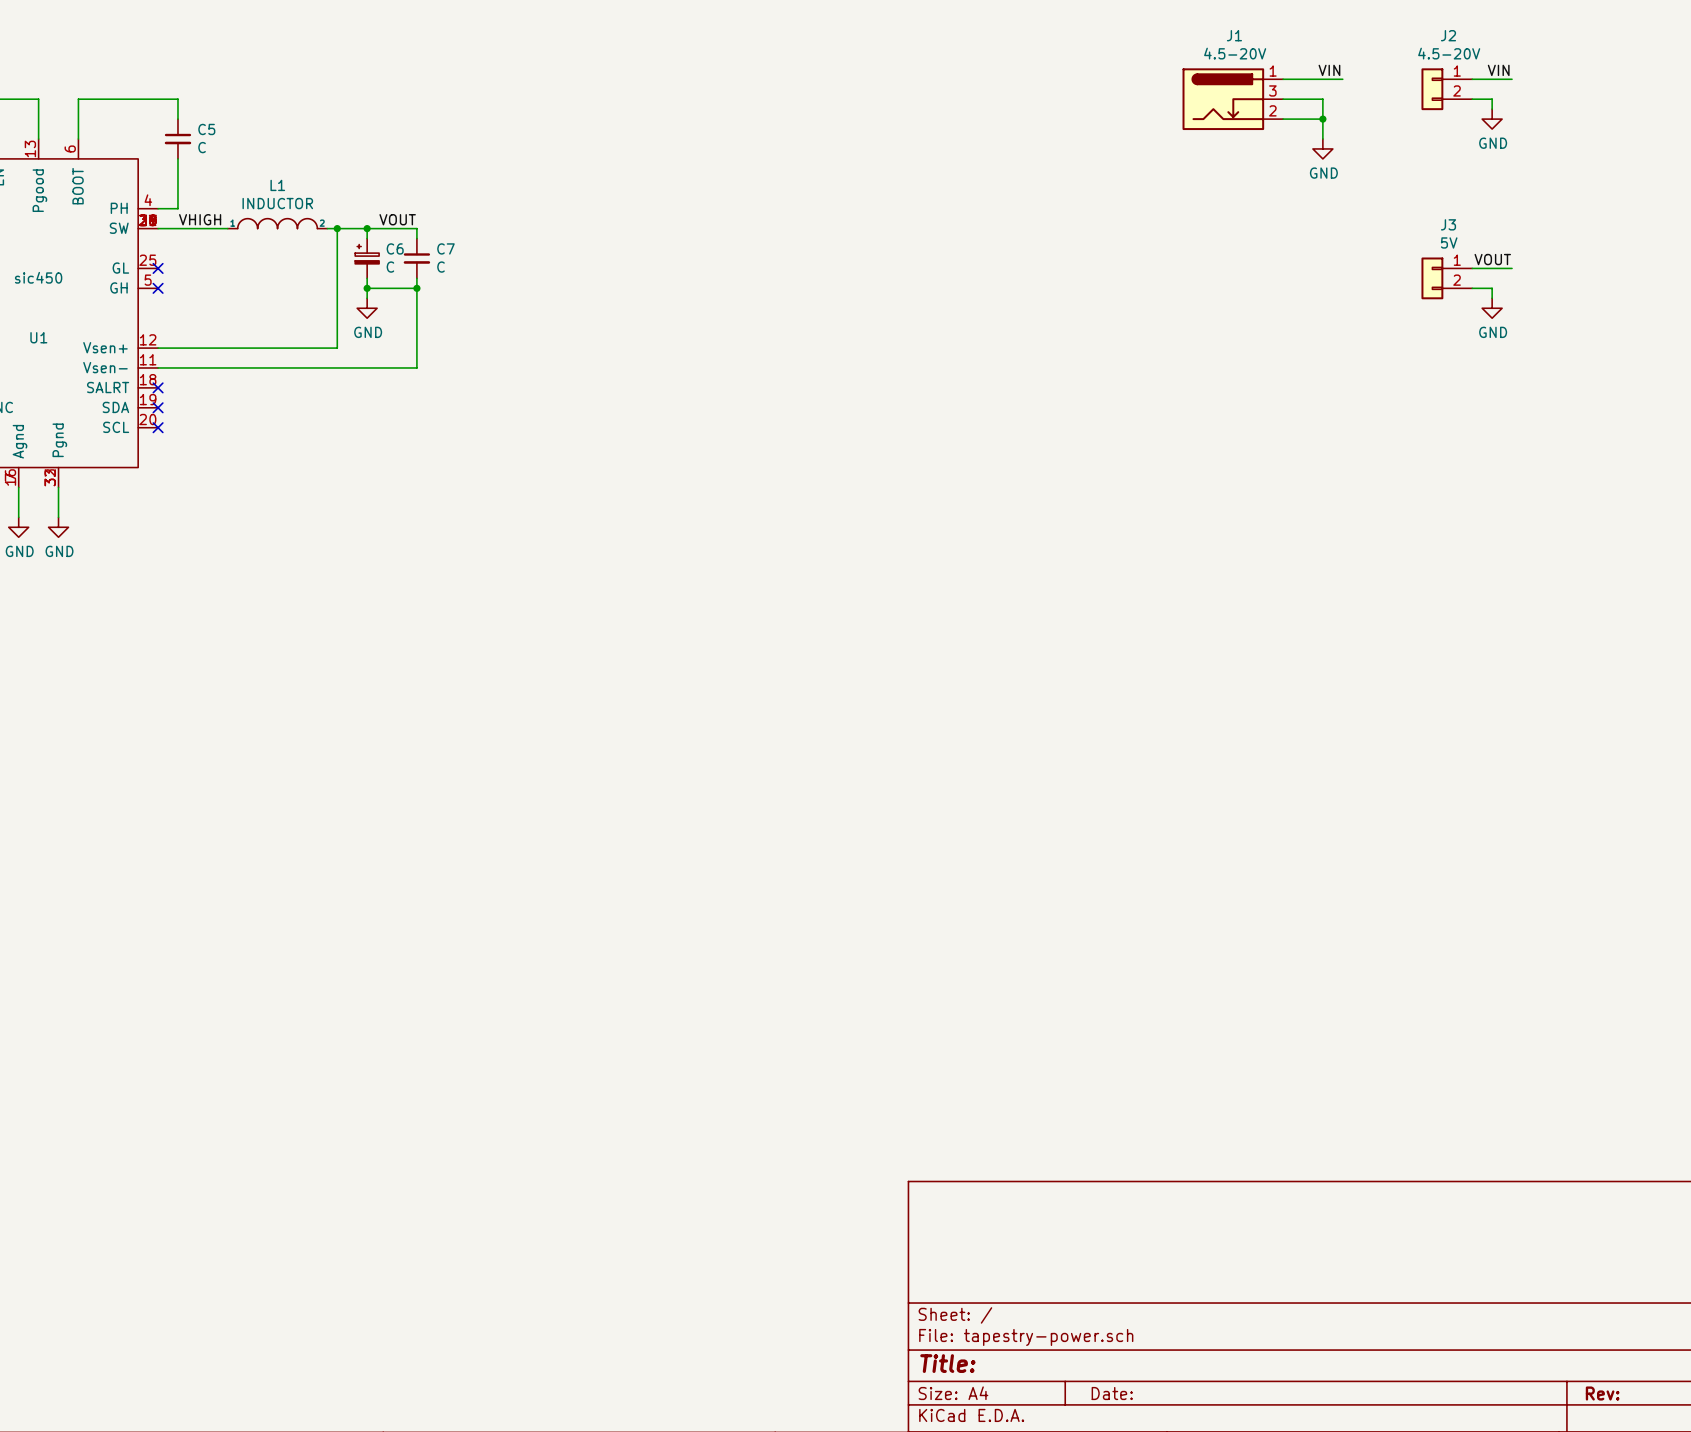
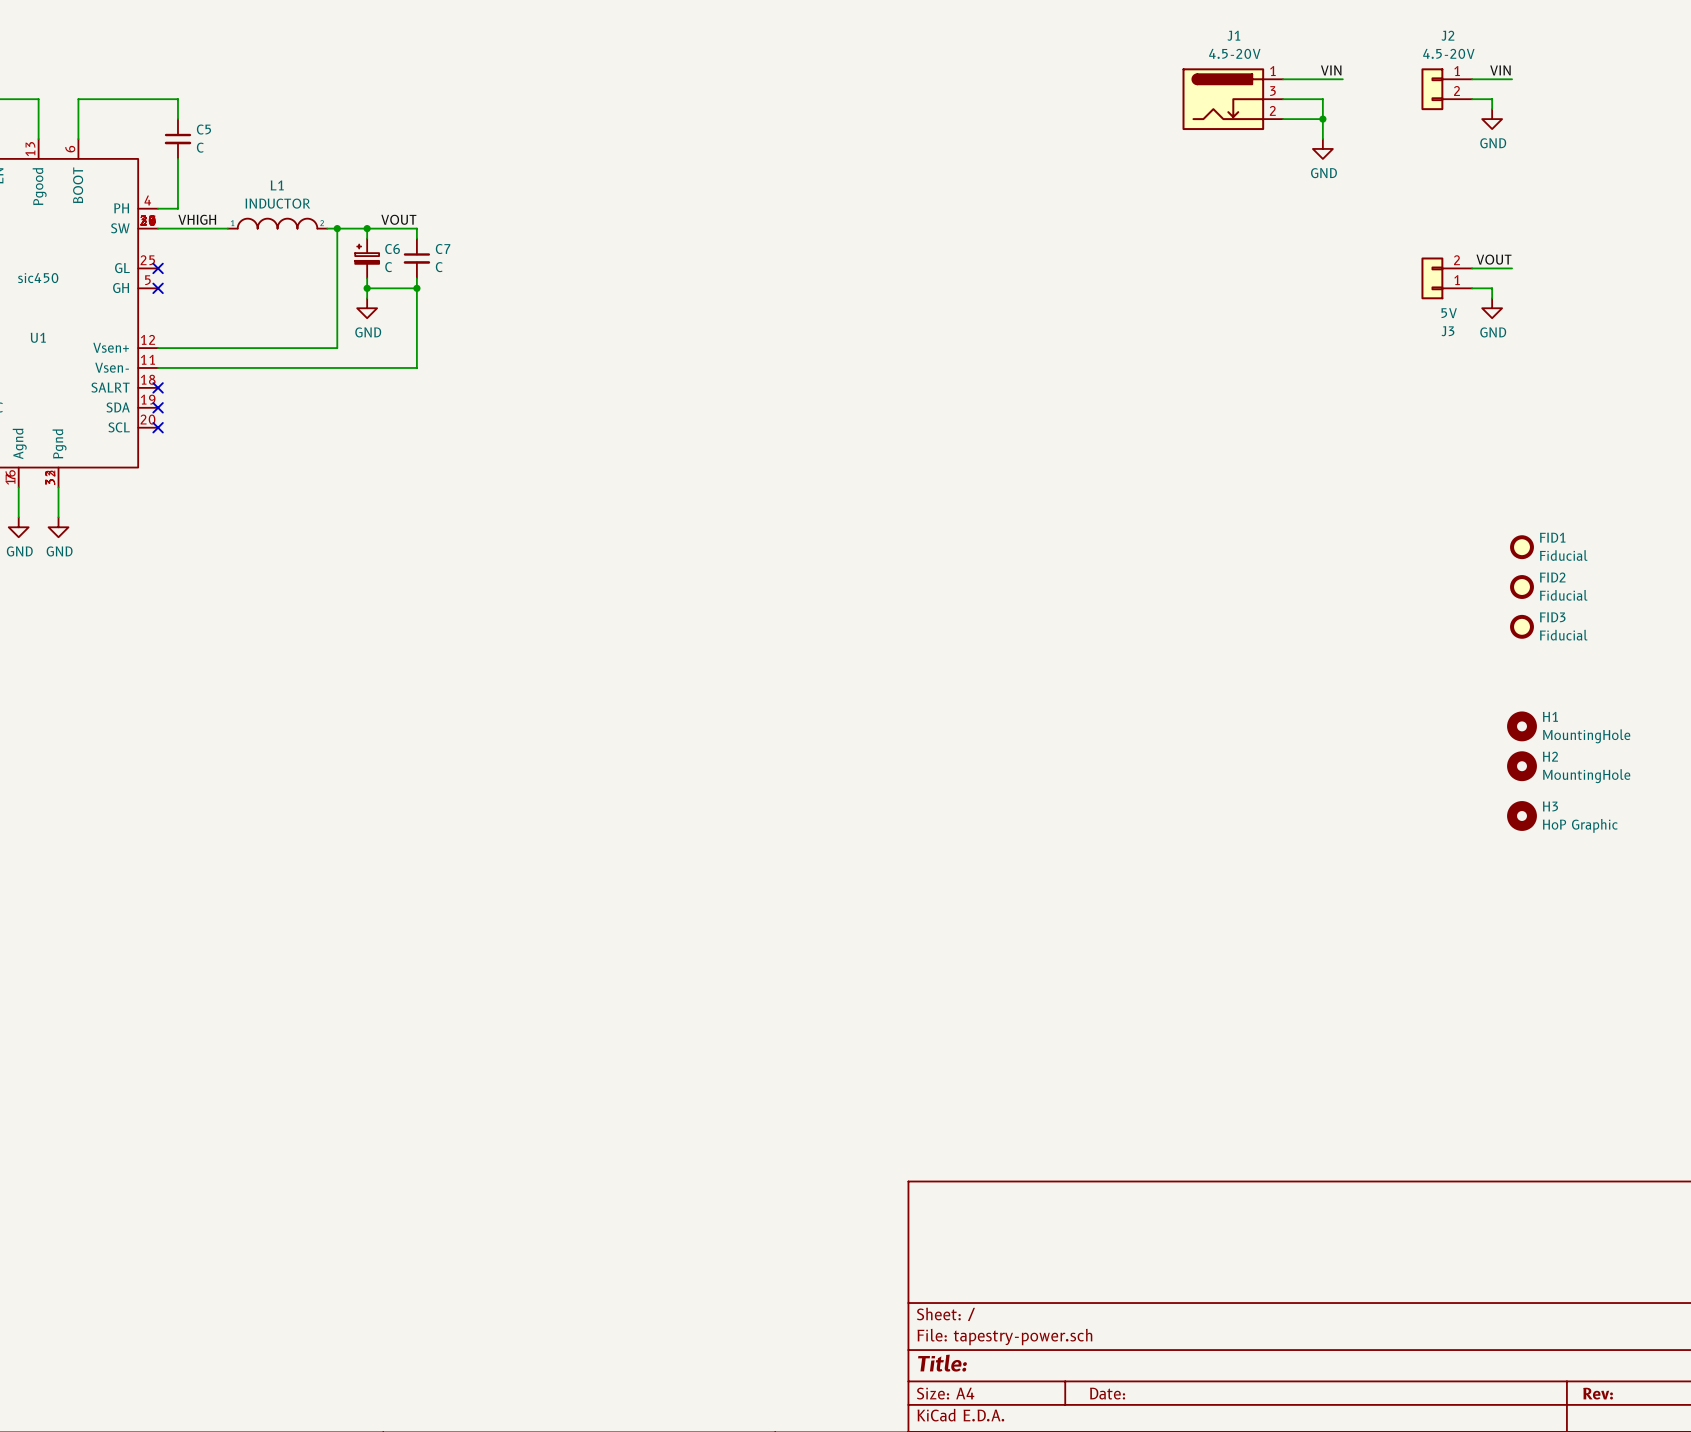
J3 flip: as is (1432, 278) -> up-down (1432, 278)
FID1: none -> Fiducial (1522, 547)
FID2: none -> Fiducial (1522, 587)
FID3: none -> Fiducial (1522, 626)
H1: none -> MountingHole (1522, 726)
H2: none -> MountingHole (1522, 766)
H3: none -> HoP Graphic (1522, 815)

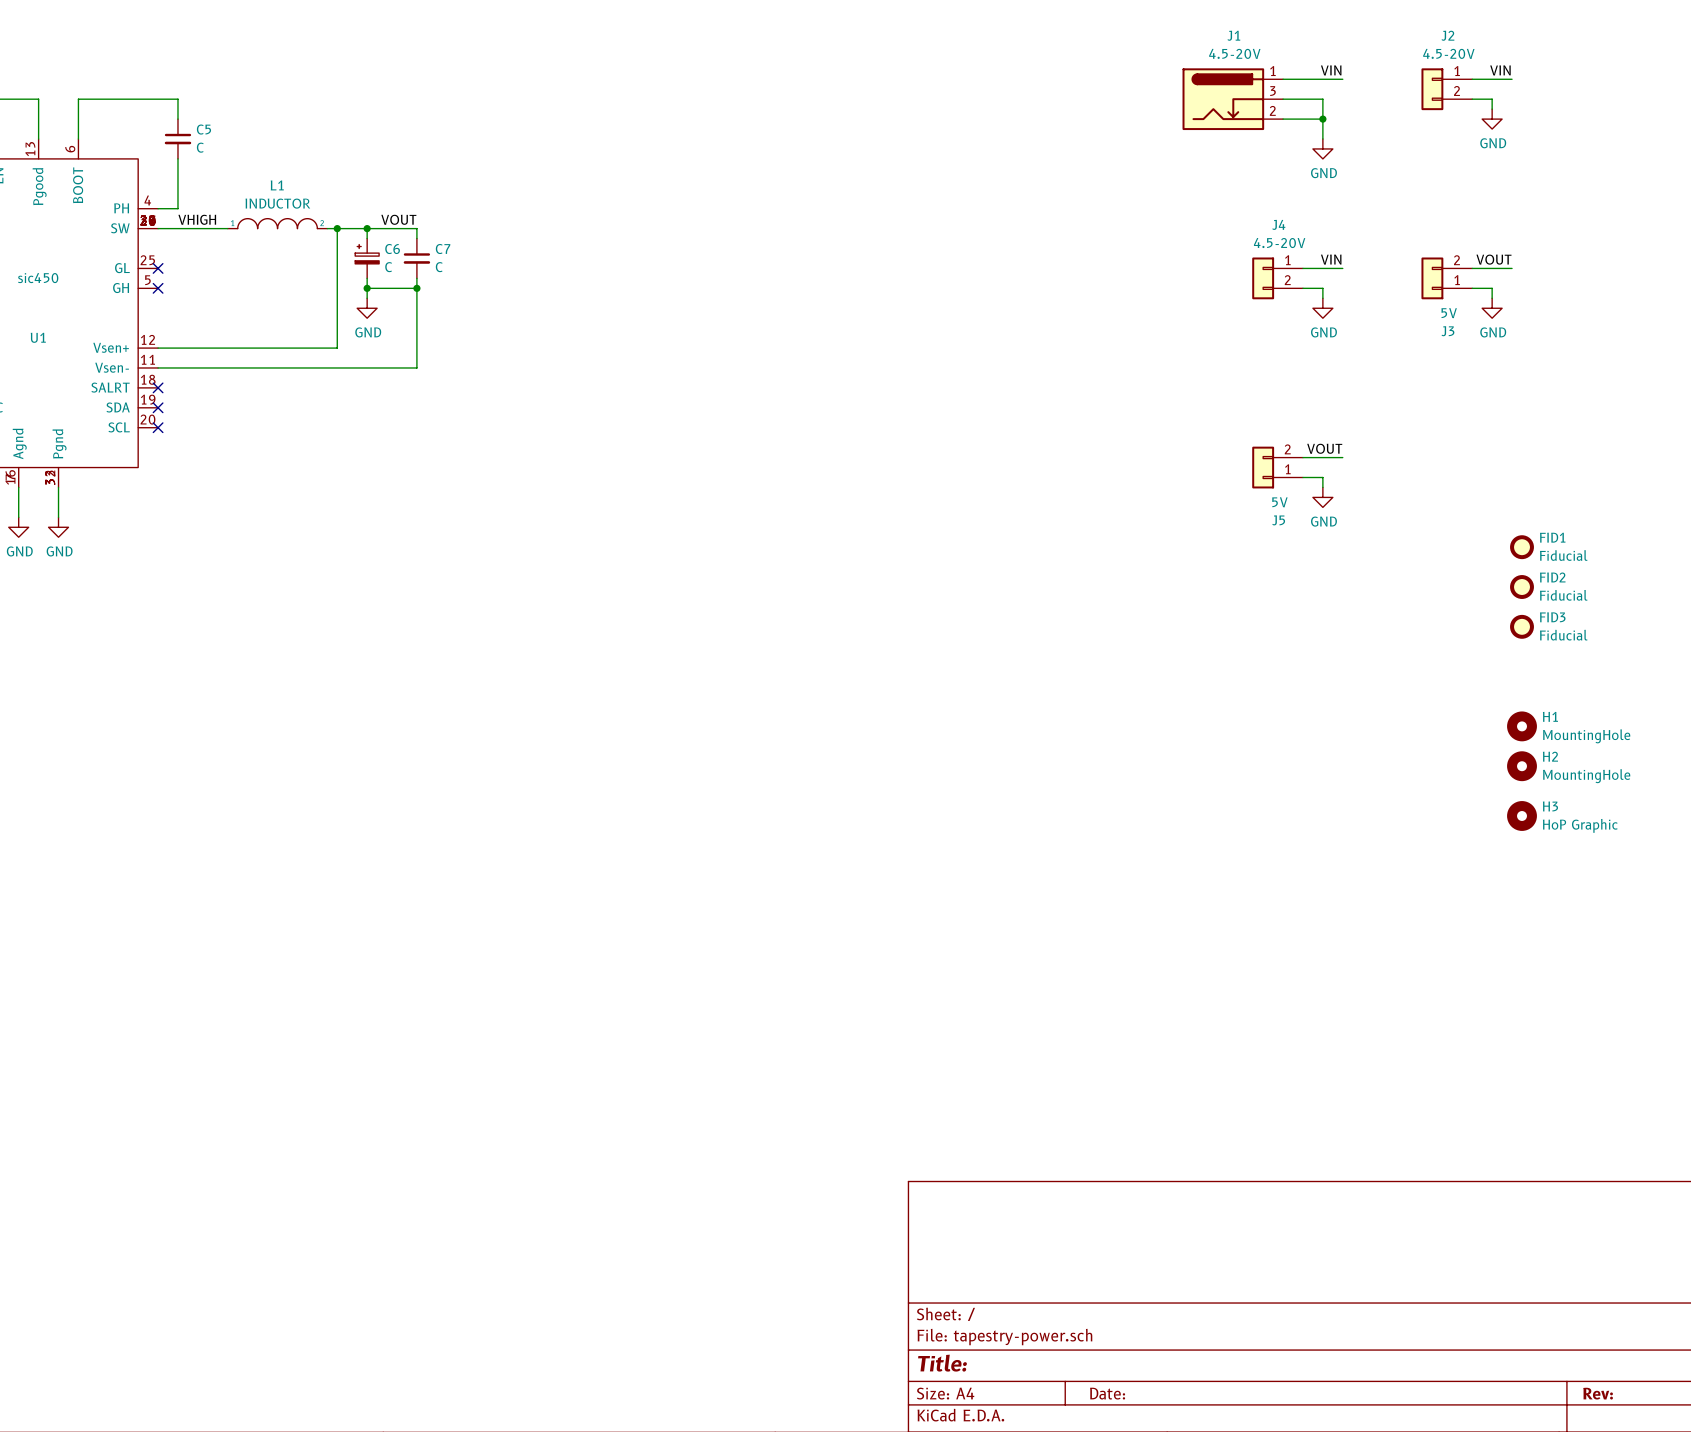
label: none -> VIN (1331, 259)
wire: none -> (1302, 268) (1342, 268)
J4: none -> 4.5-20V (1277, 278)
wire: none -> (1302, 288) (1322, 288) (1322, 298)
power symbol: none -> GND (1322, 308)
label: none -> VOUT (1324, 448)
wire: none -> (1302, 457) (1342, 457)
J5: none -> 5V (1277, 467)
wire: none -> (1302, 477) (1322, 477) (1322, 487)
power symbol: none -> GND (1322, 497)

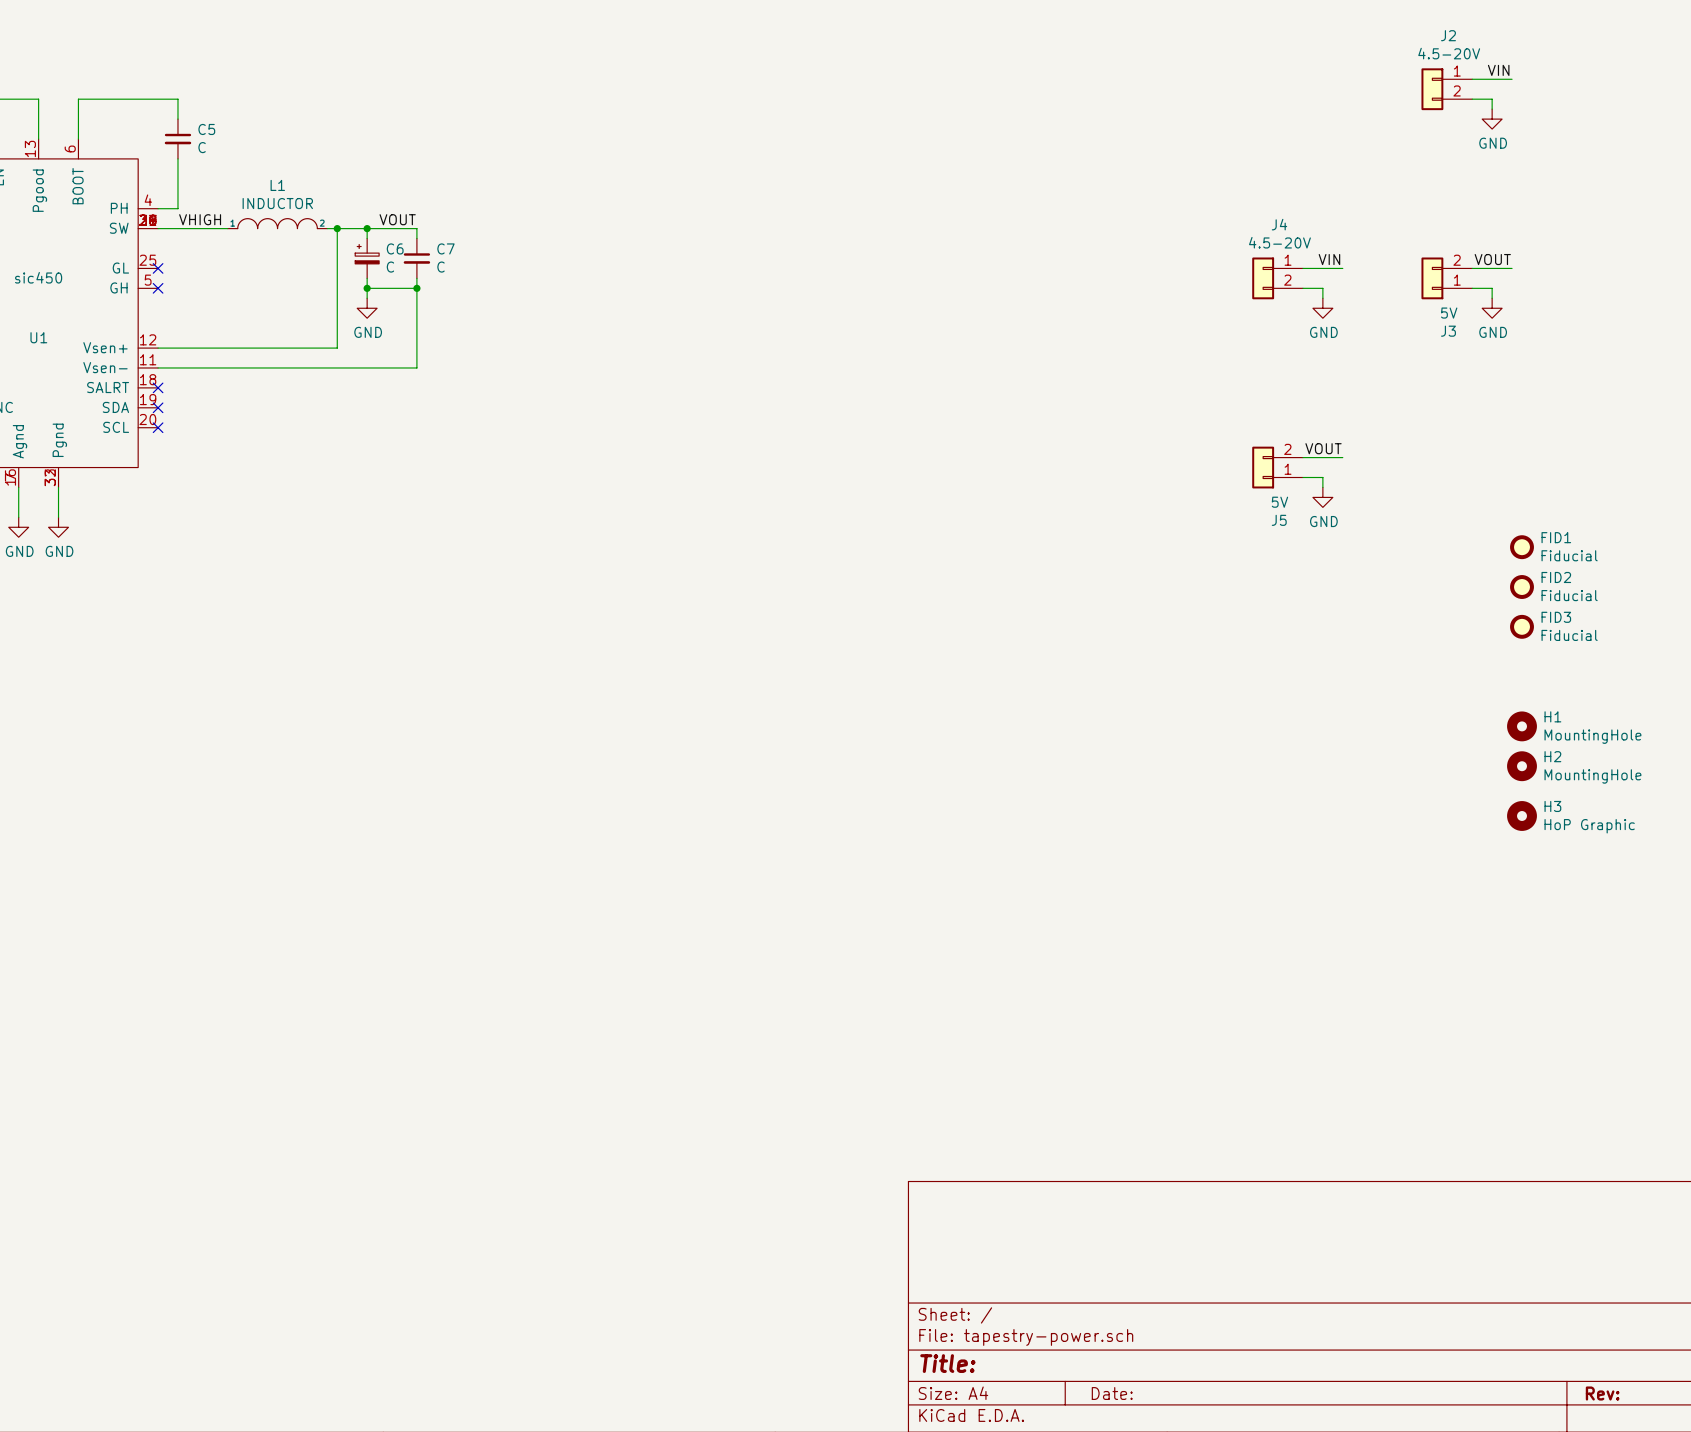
label: VIN (1331, 70) -> none
wire: (1283, 79) (1342, 79) -> none
J1: 4.5-20V (1232, 99) -> none
wire: (1283, 99) (1322, 99) (1322, 139) -> none
wire: (1283, 119) (1322, 119) -> none
junction: (1322, 119) -> none
power symbol: GND (1322, 148) -> none

